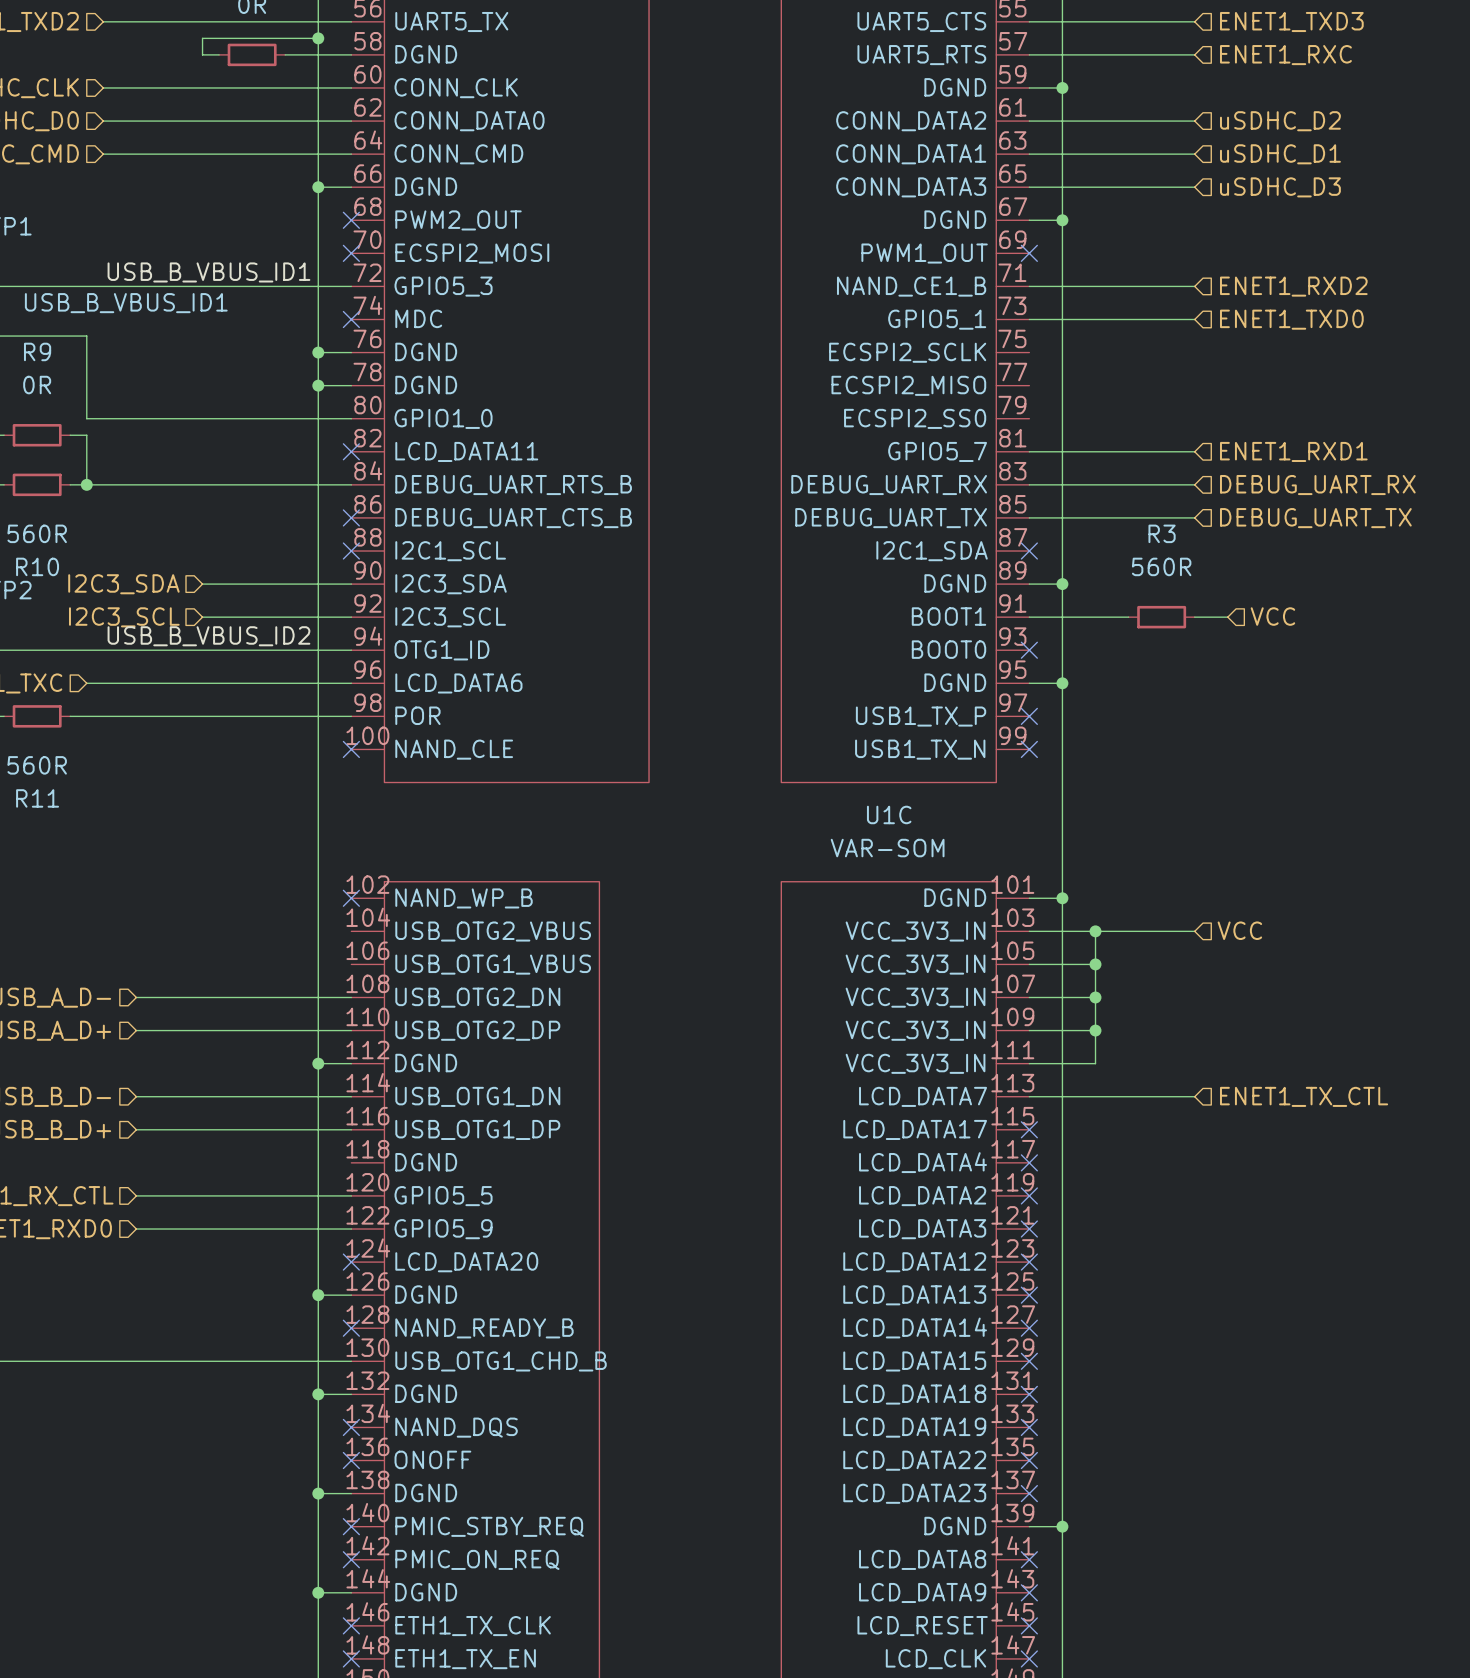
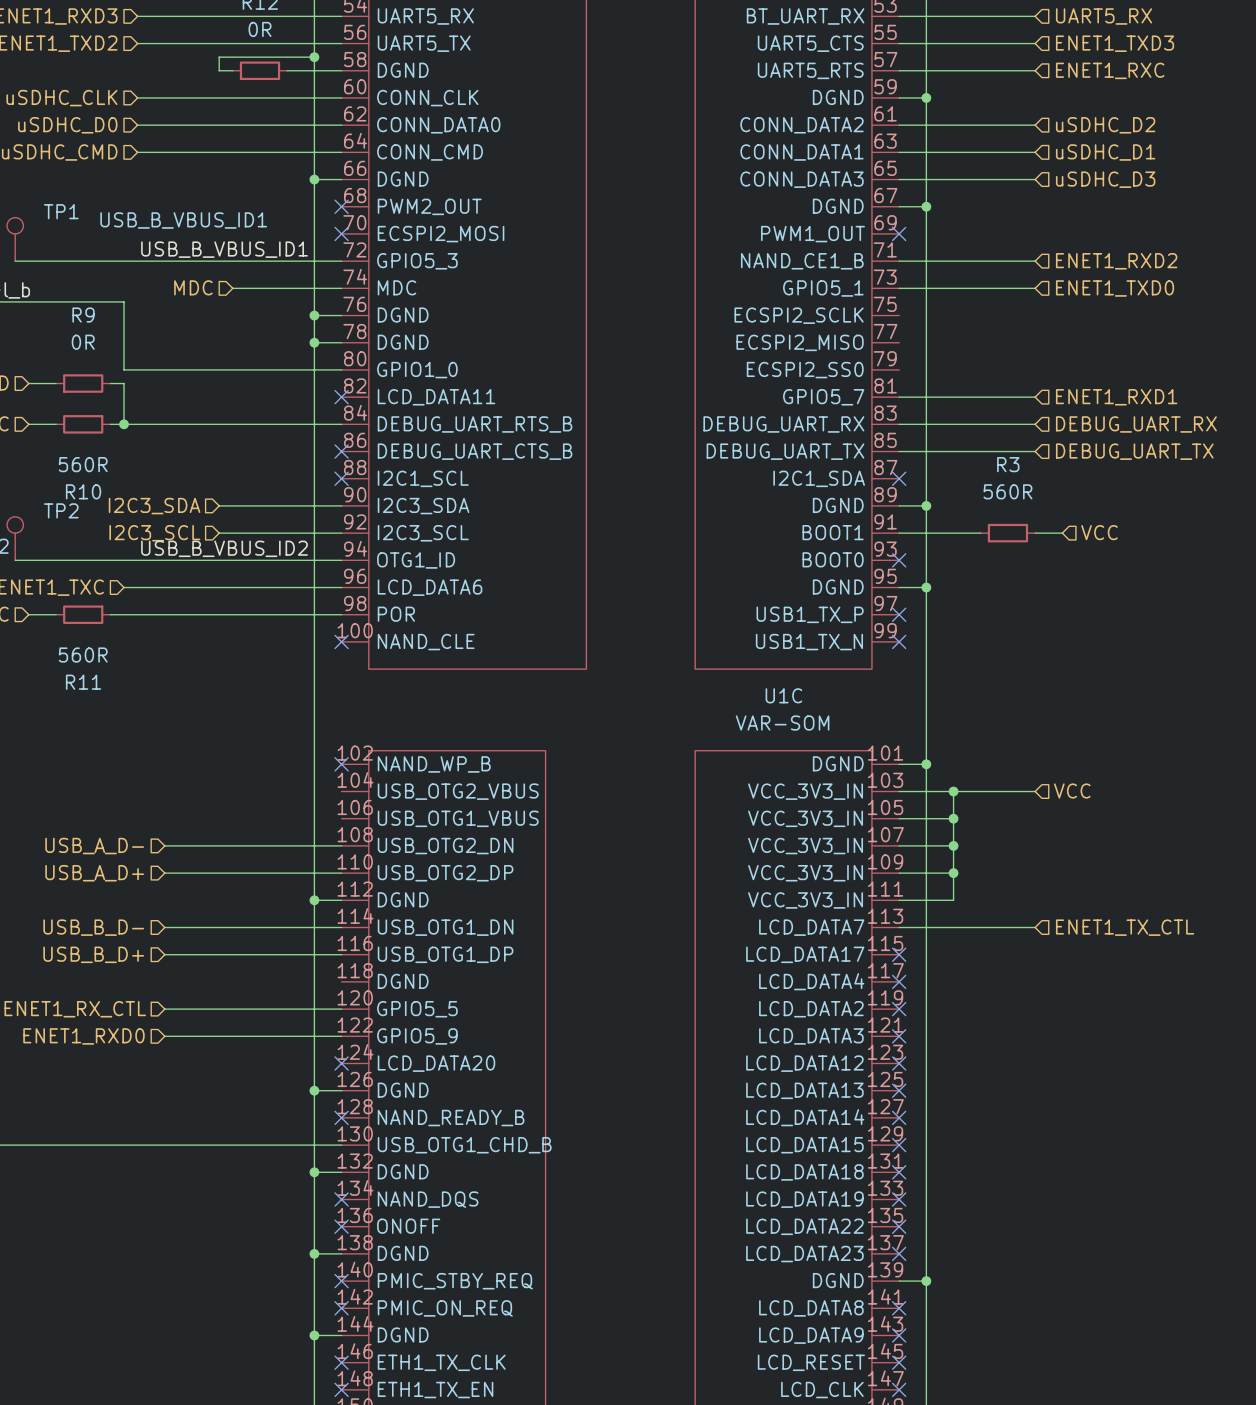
TP1 value position: USB_B_VBUS_ID1 (126, 303) -> USB_B_VBUS_ID1 (183, 220)
hierarchical label: none -> MDC (193, 287)
wire: none -> (232, 288) (341, 288)
no-connect mark: (351, 319) -> none

